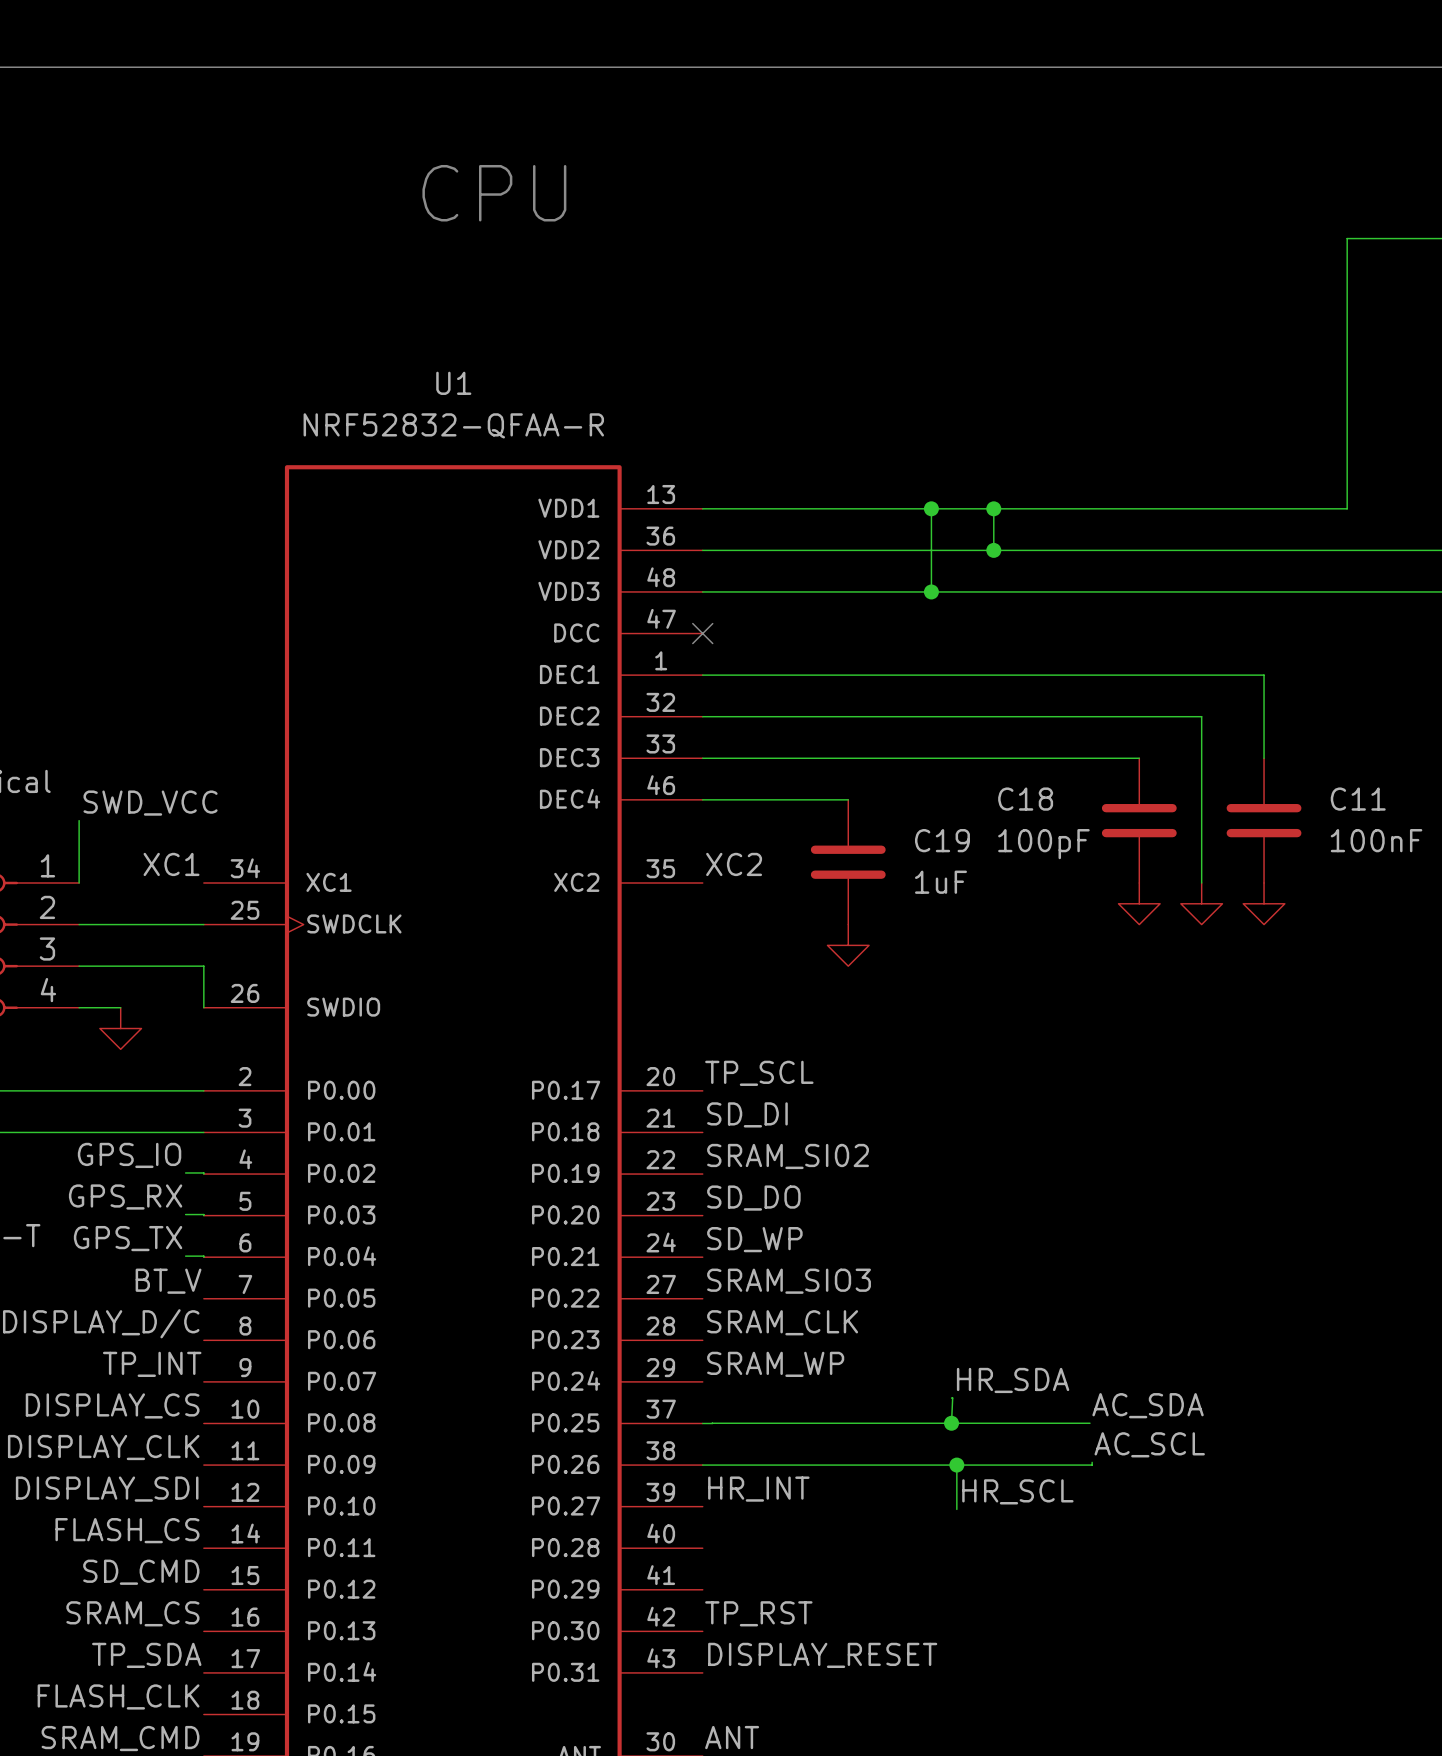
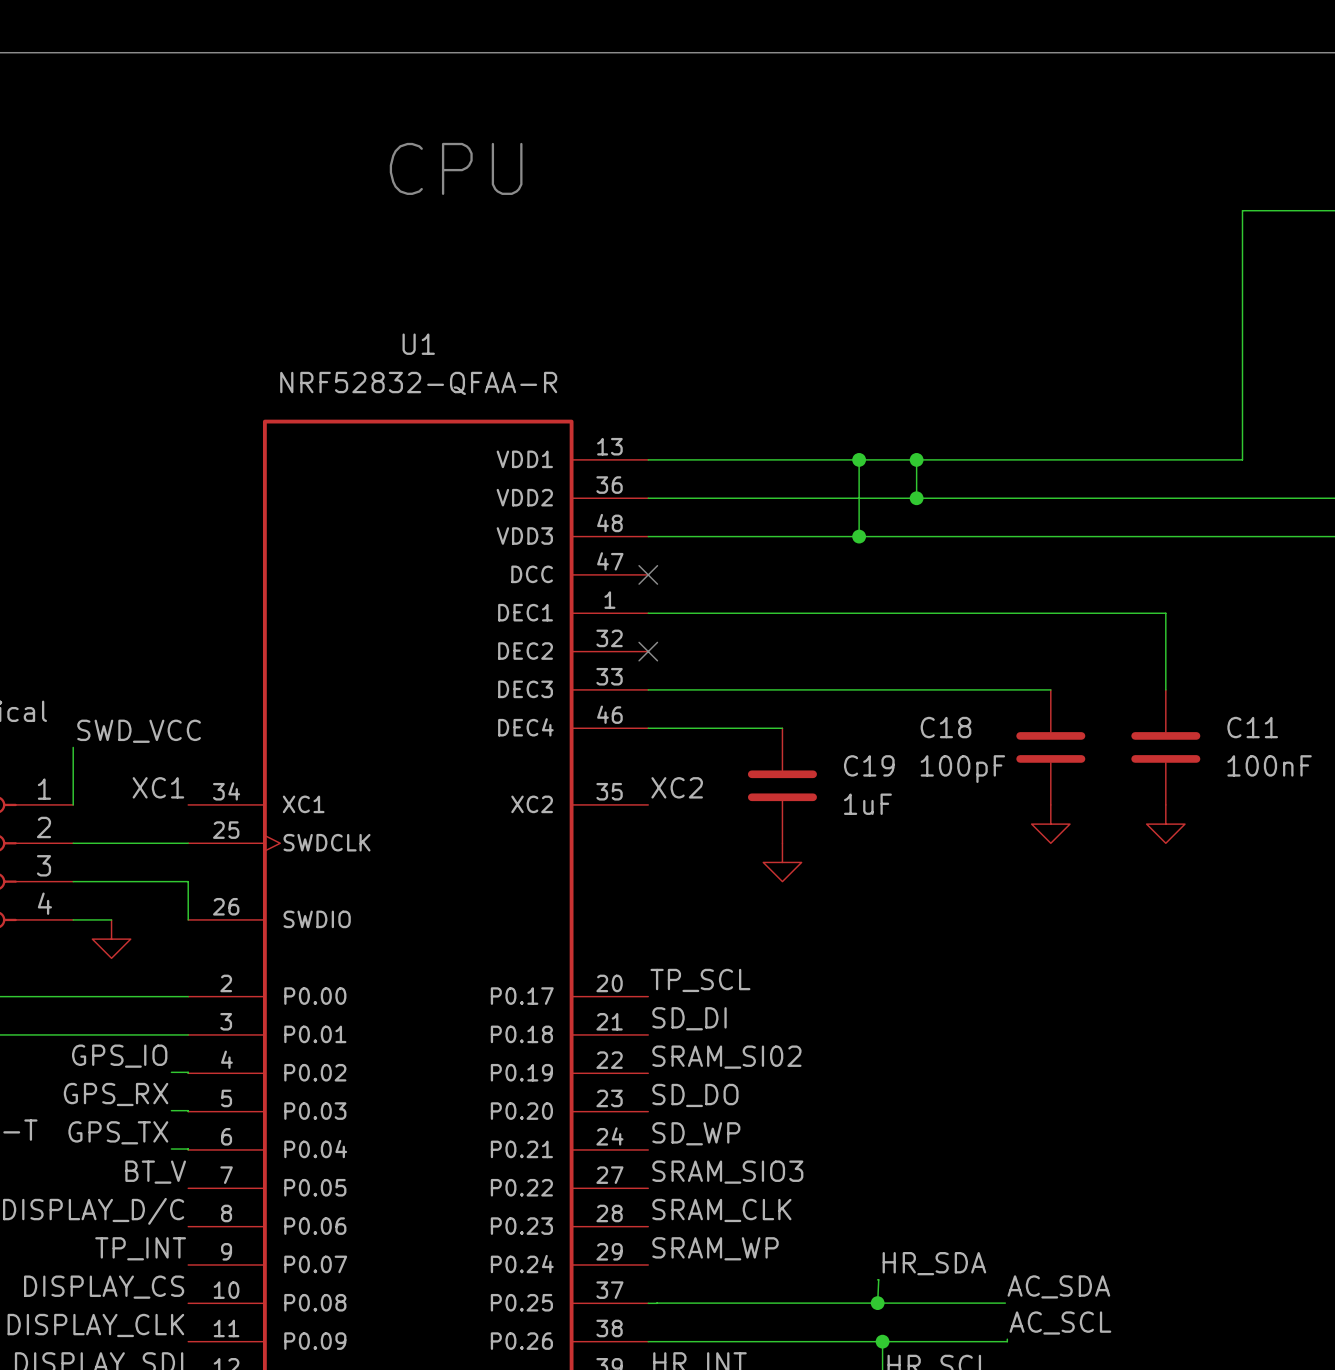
wire: (702, 716) (1201, 716) (1201, 883) -> none
no-connect mark: none -> (648, 651)
power symbol: (1201, 903) -> none

